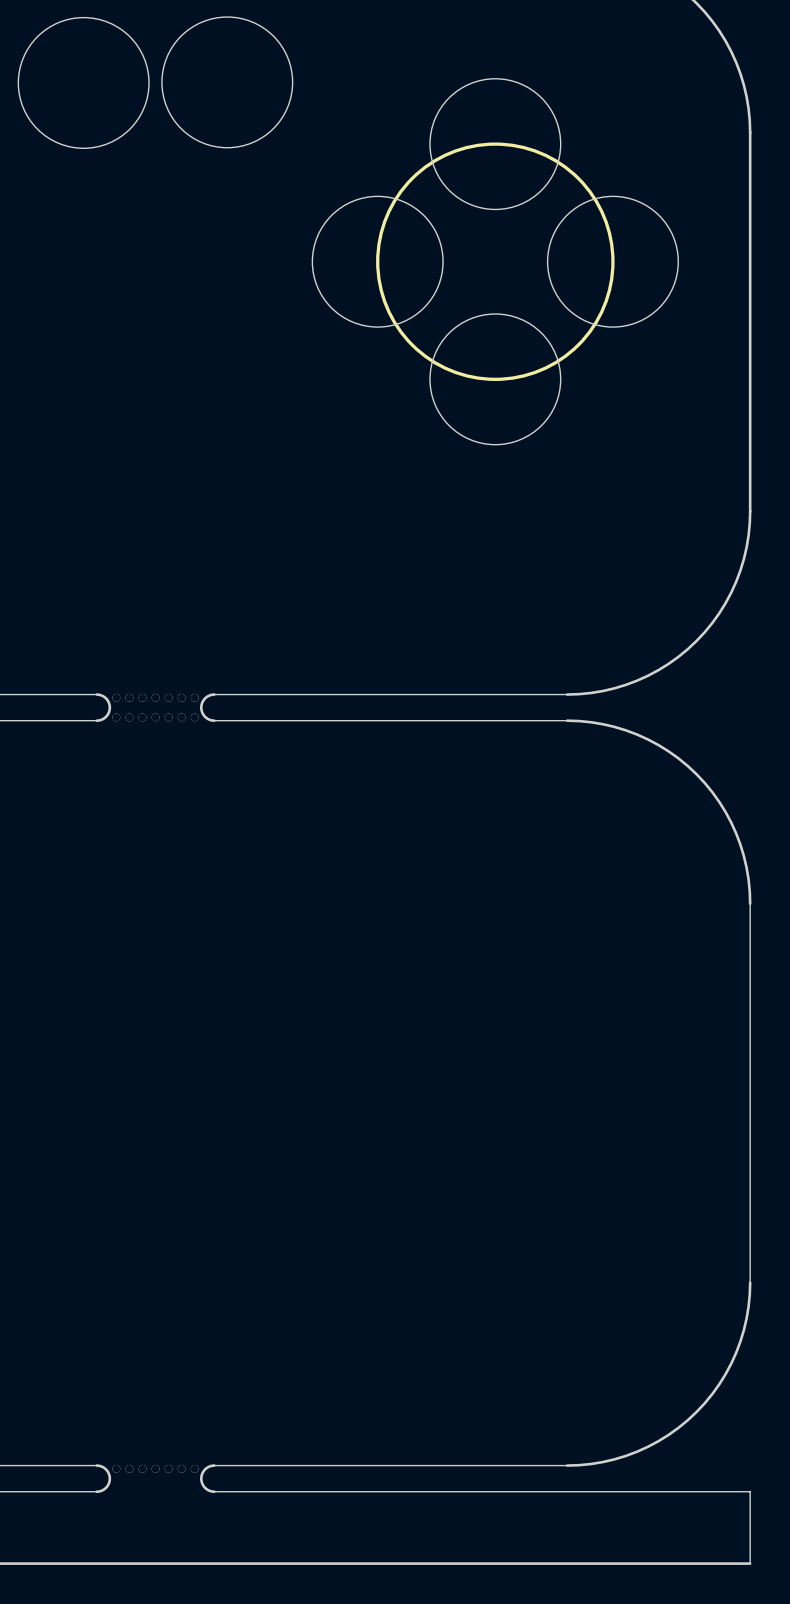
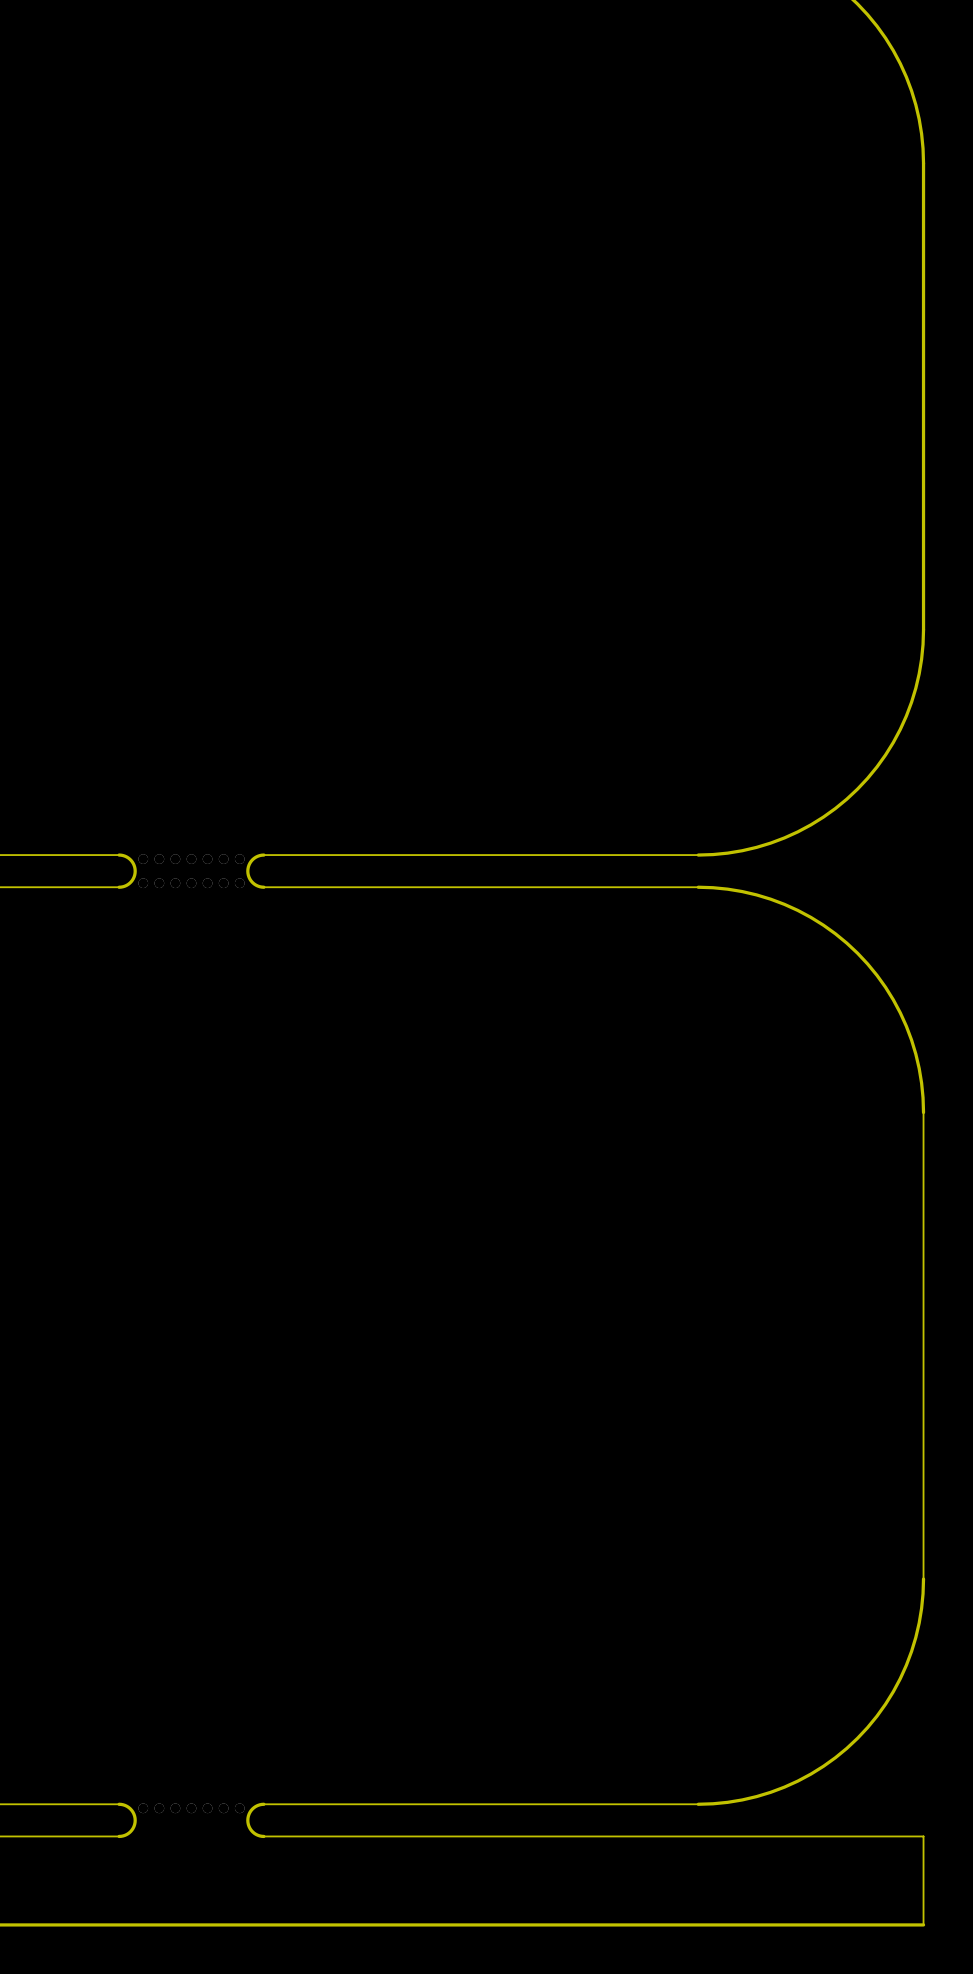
round board edge: [17, 16, 150, 149] -> none
round board edge: [161, 16, 294, 149] -> none
round board edge: [429, 78, 562, 211] -> none
drawing: [376, 142, 615, 381] -> none
round board edge: [311, 195, 444, 328] -> none
round board edge: [546, 195, 679, 328] -> none
round board edge: [429, 313, 562, 446] -> none

